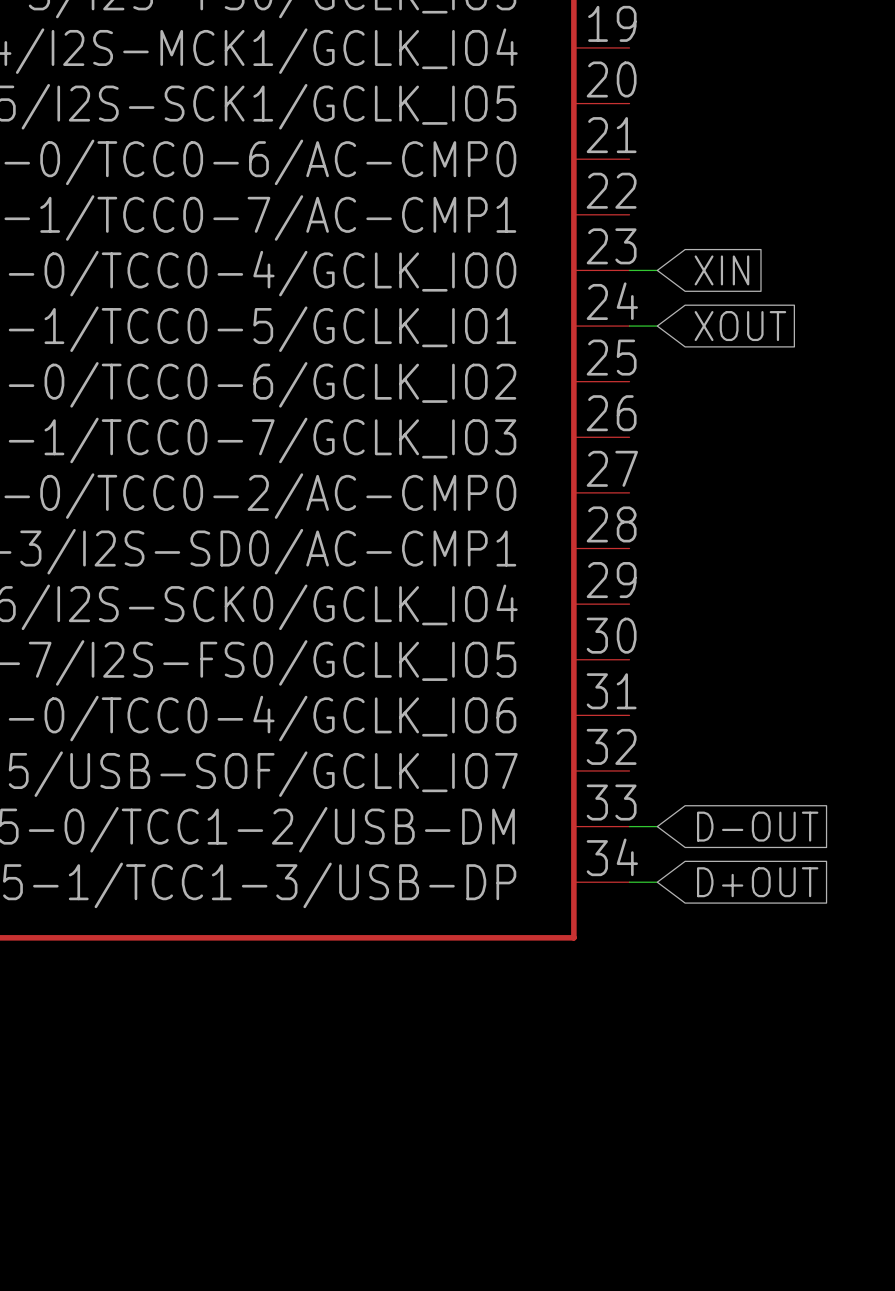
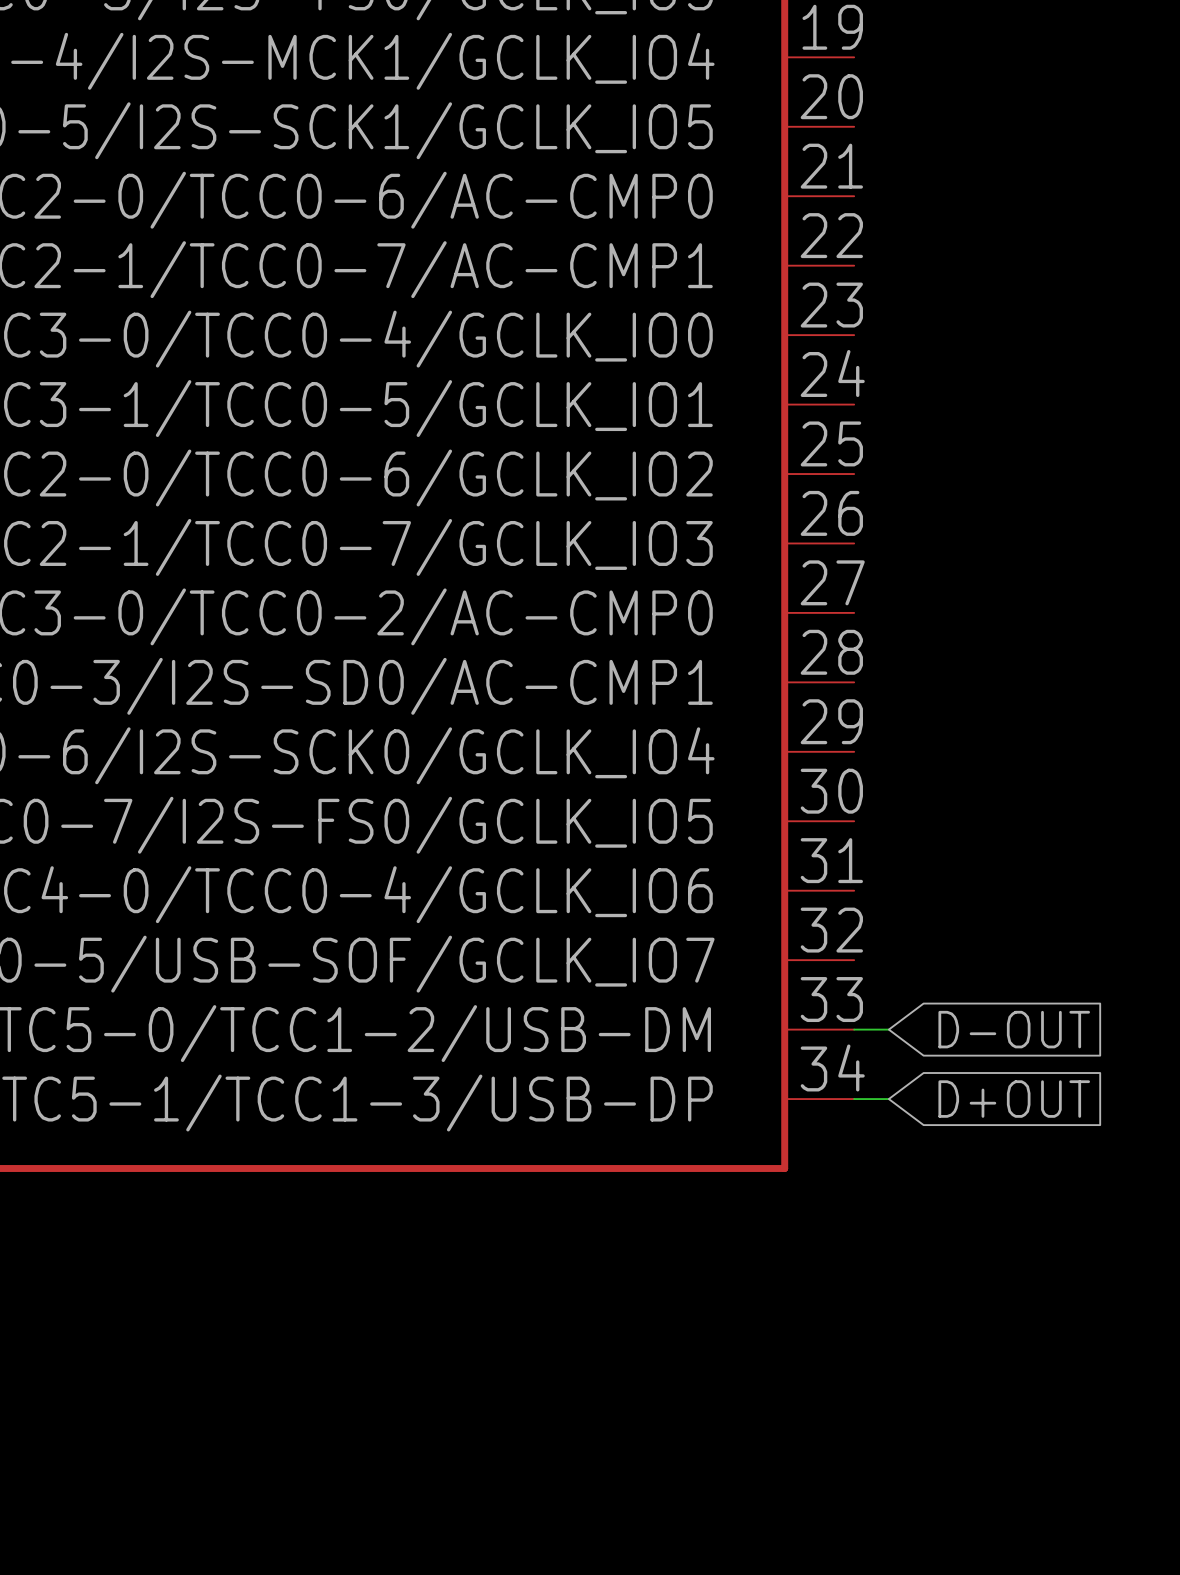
wire: (629, 270) (657, 270) -> none
global label: XIN (721, 270) -> none
wire: (629, 326) (657, 326) -> none
global label: XOUT (740, 326) -> none

